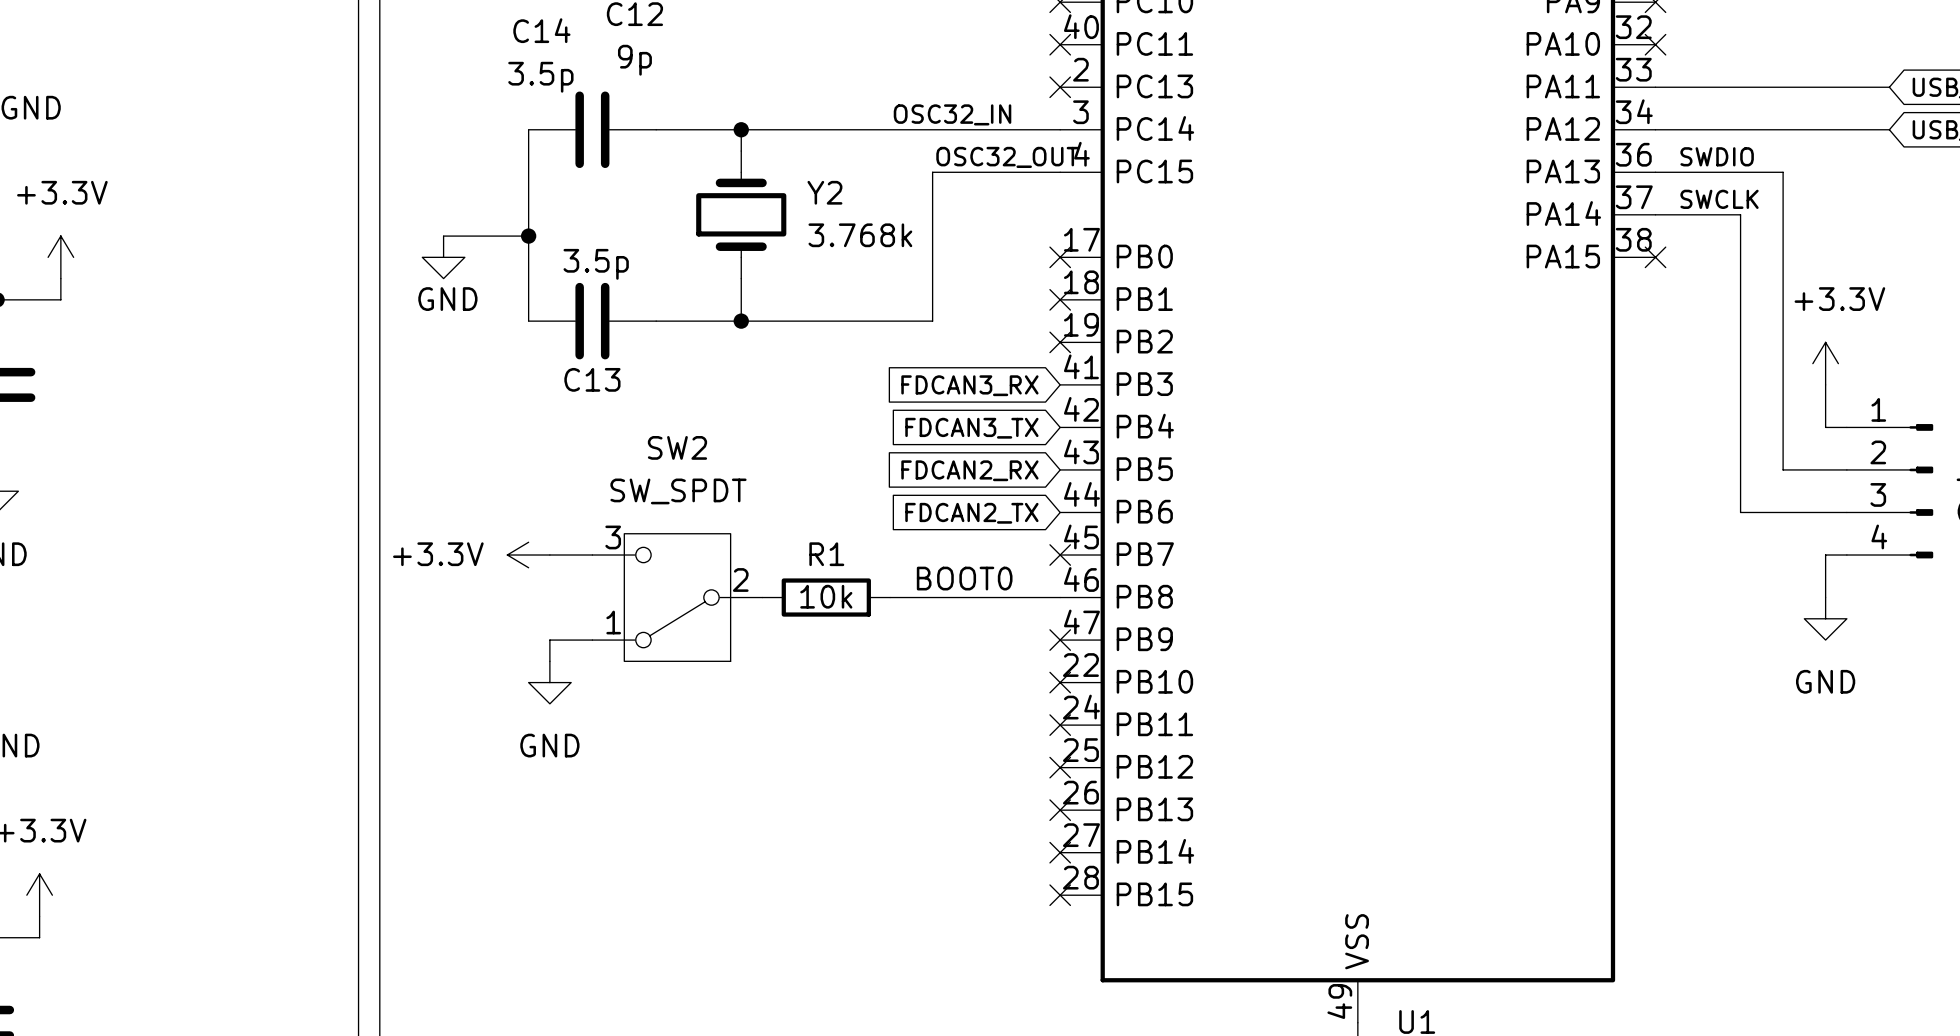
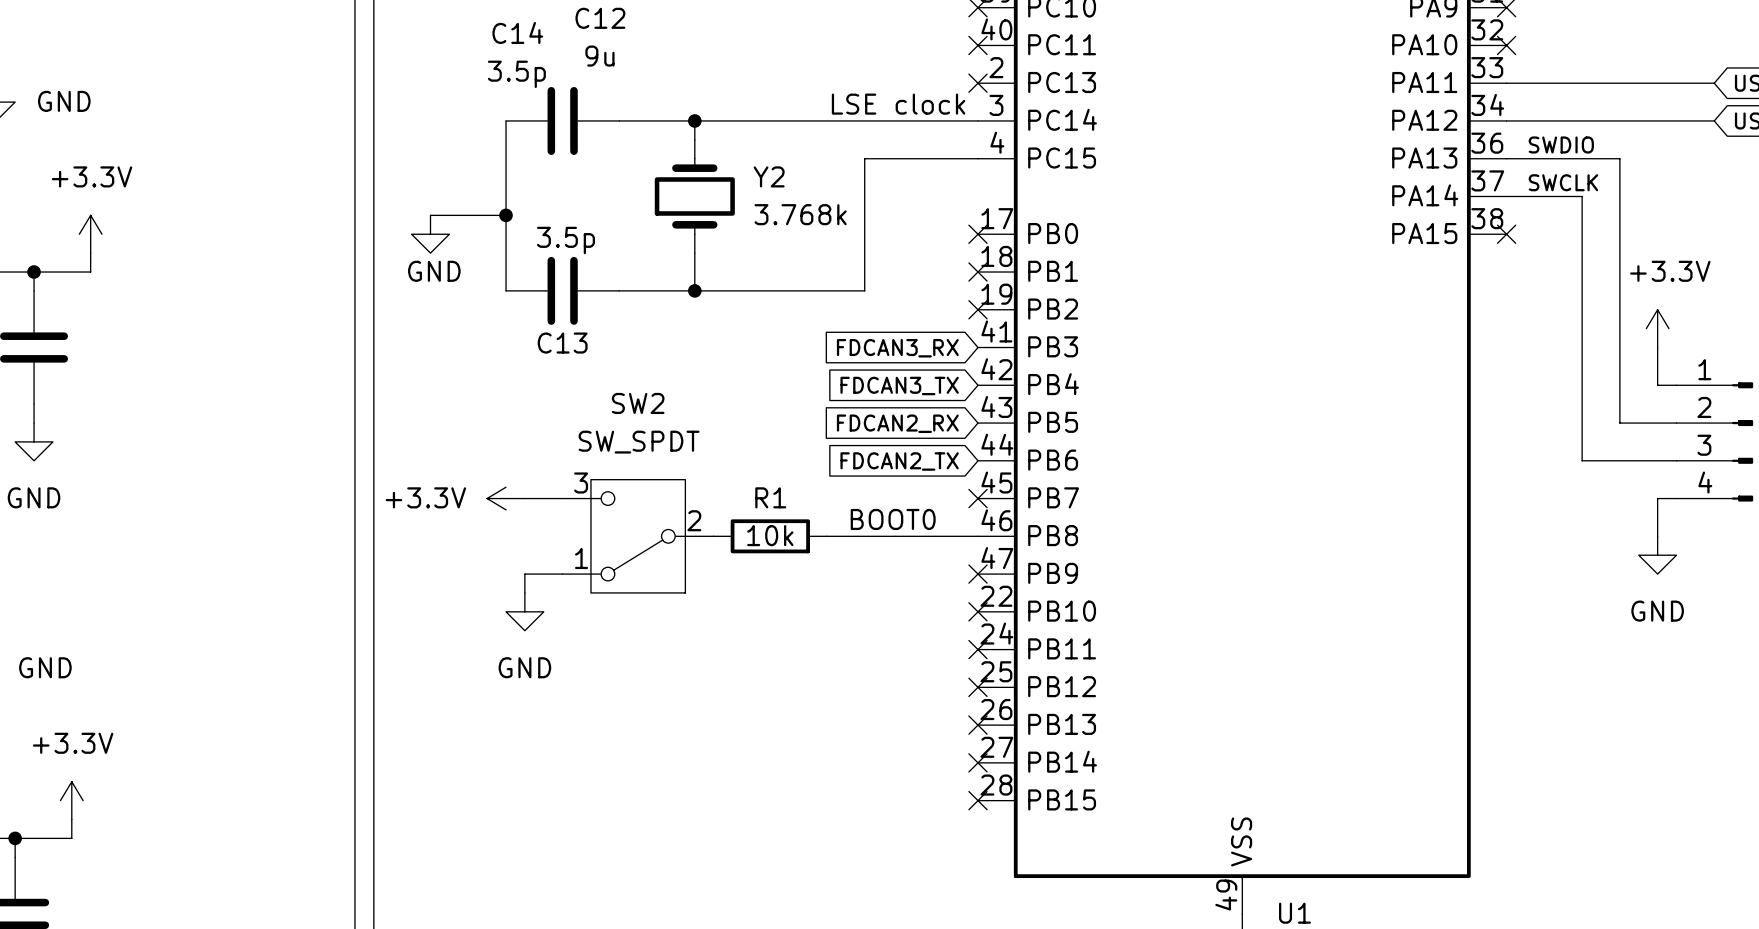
C12 value: 9p (634, 60) -> 9u (599, 56)
label: OSC32_IN (952, 114) -> LSE clock (898, 104)
label: OSC32_OUT (1007, 157) -> none

